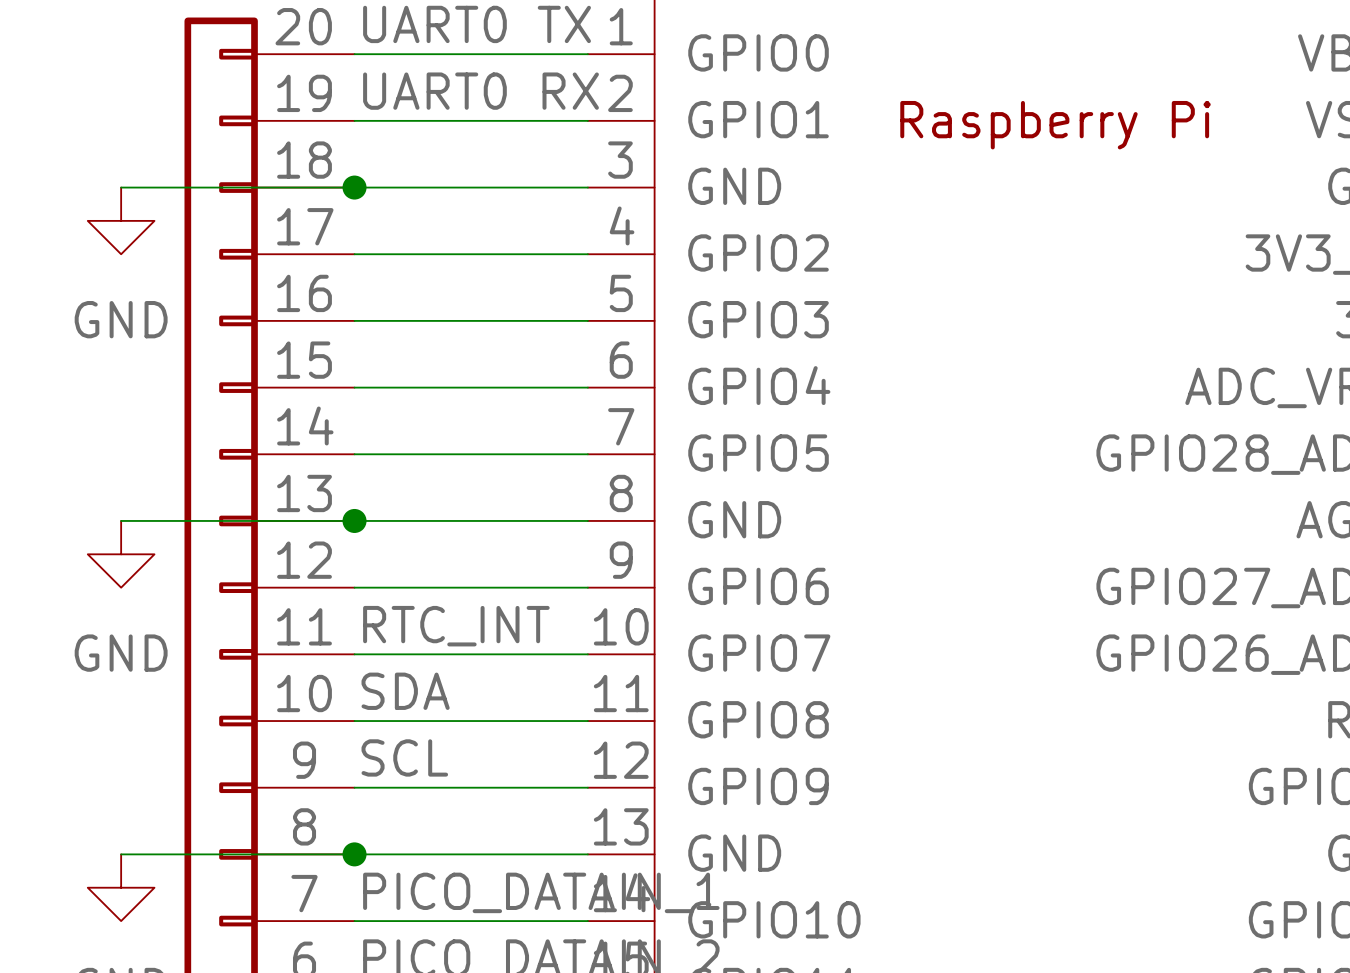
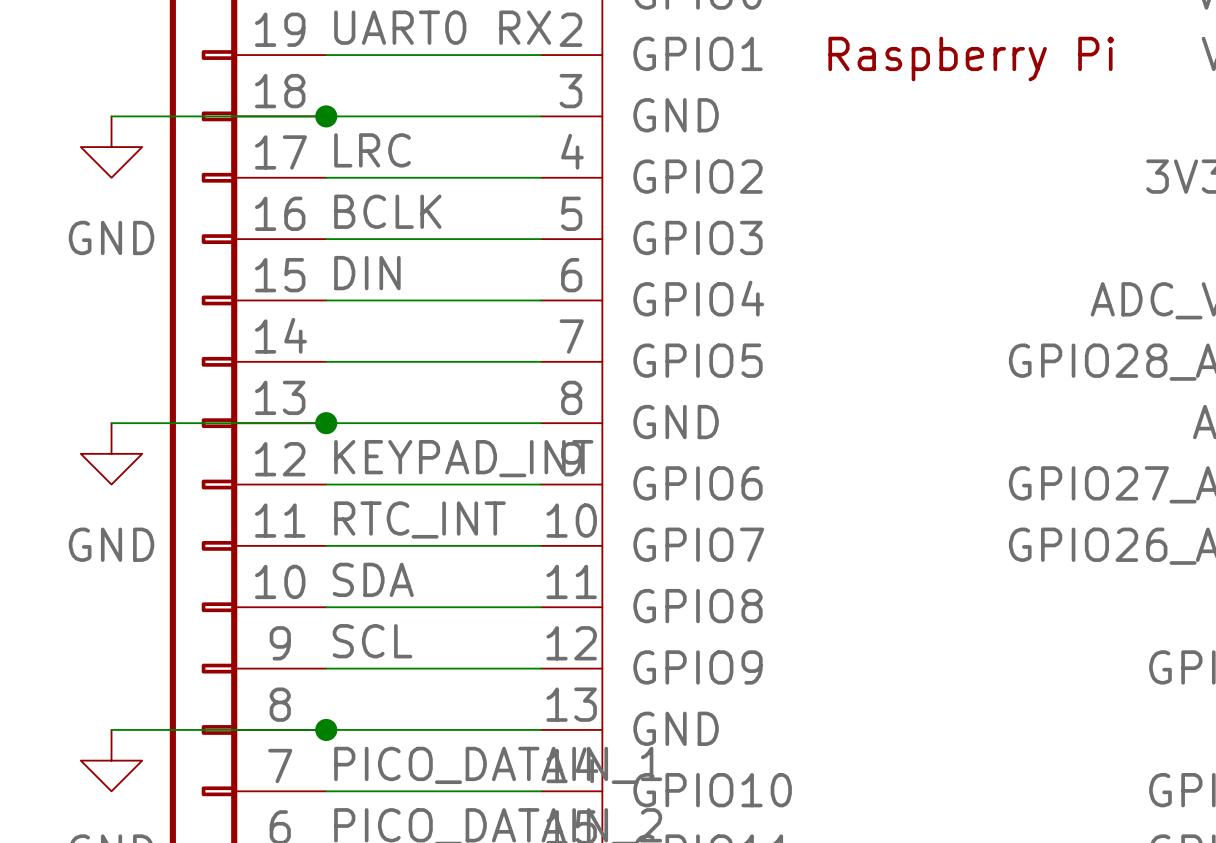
label: none -> LRC (372, 150)
label: none -> BCLK (387, 211)
label: none -> DIN (367, 273)
label: none -> KEYPAD_INT (463, 458)

